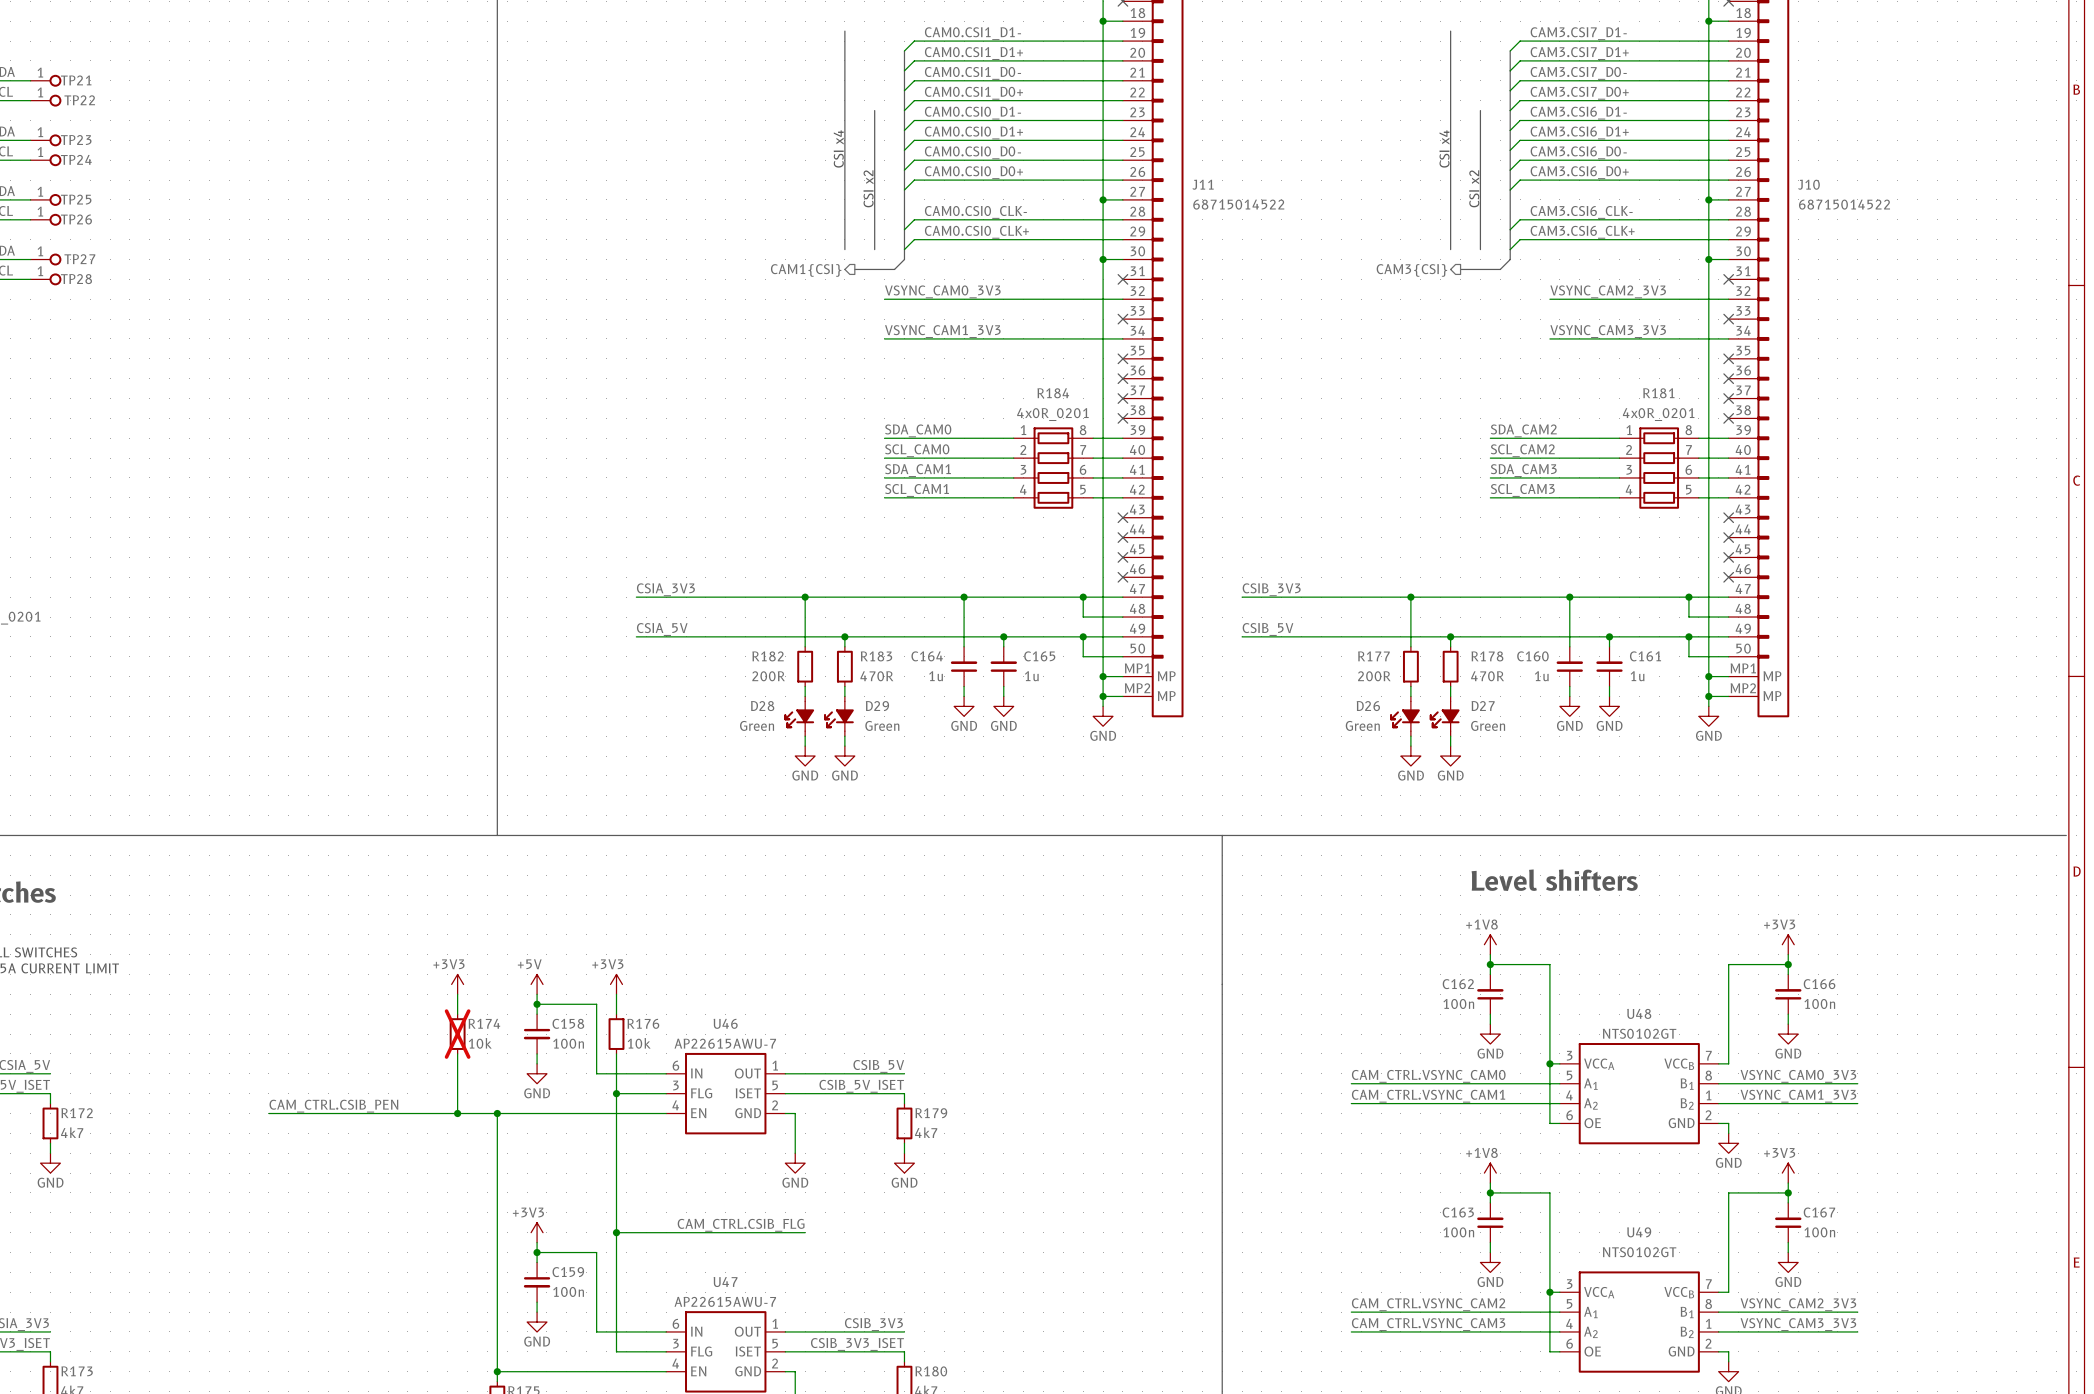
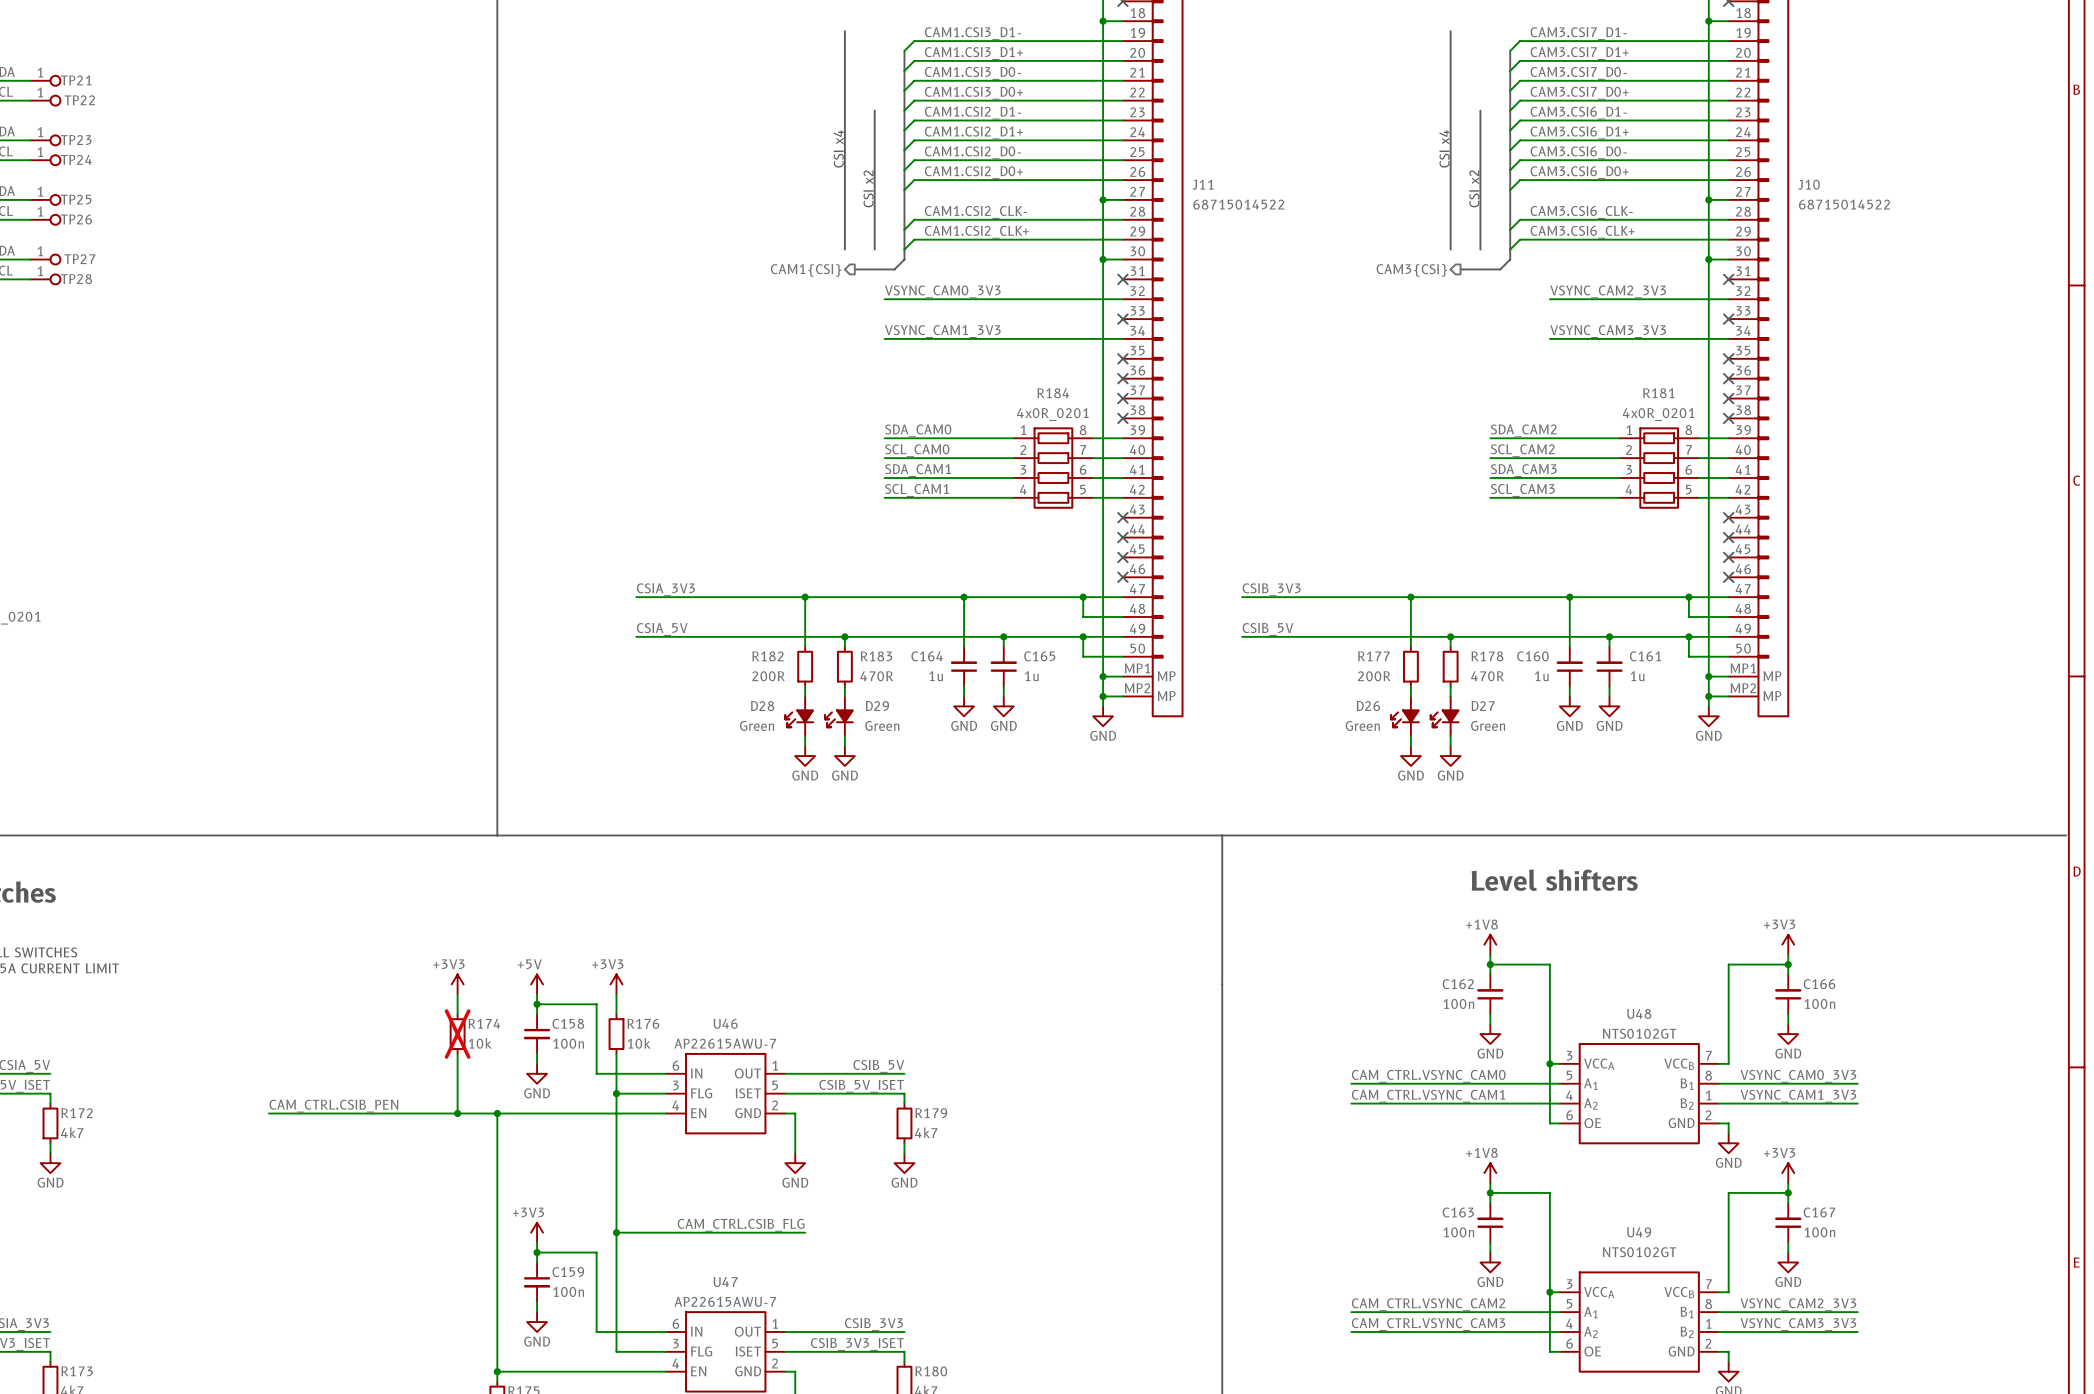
label: CAM0.CSI1_D1- (972, 33) -> CAM1.CSI3_D1- (972, 33)
label: CAM0.CSI1_D1+ (973, 53) -> CAM1.CSI3_D1+ (973, 53)
label: CAM0.CSI1_D0- (972, 73) -> CAM1.CSI3_D0- (972, 73)
label: CAM0.CSI1_D0+ (973, 93) -> CAM1.CSI3_D0+ (973, 93)
label: CAM0.CSI0_D1- (972, 113) -> CAM1.CSI2_D1- (972, 113)
label: CAM0.CSI0_D1+ (973, 132) -> CAM1.CSI2_D1+ (973, 132)
label: CAM0.CSI0_D0- (972, 152) -> CAM1.CSI2_D0- (972, 152)
label: CAM0.CSI0_D0+ (973, 172) -> CAM1.CSI2_D0+ (973, 172)
label: CAM0.CSI0_CLK- (975, 212) -> CAM1.CSI2_CLK- (975, 212)
label: CAM0.CSI0_CLK+ (976, 232) -> CAM1.CSI2_CLK+ (976, 232)

